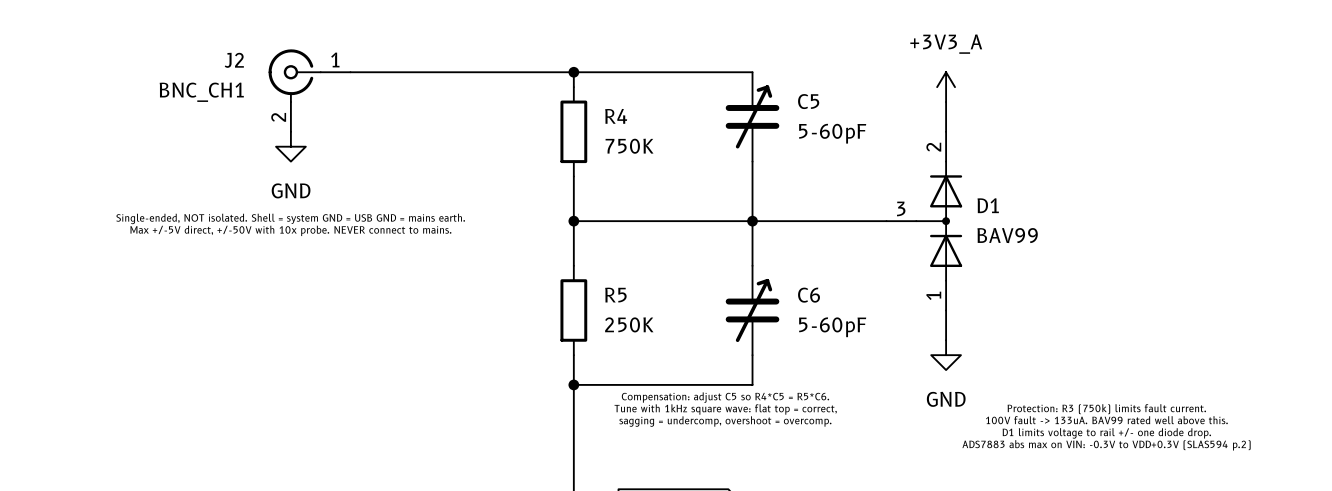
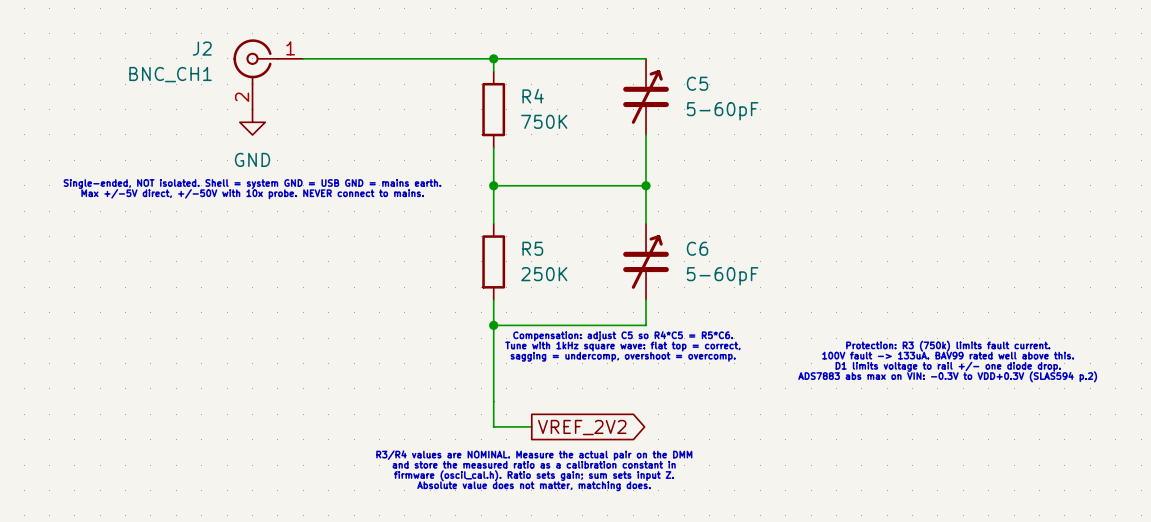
power symbol: +3V3_A (946, 87) -> none
wire: (946, 102) (946, 131) -> none
wire: (752, 221) (886, 221) -> none
D1: BAV99 (924, 221) -> none
wire: (946, 310) (946, 340) -> none
power symbol: GND (946, 355) -> none

